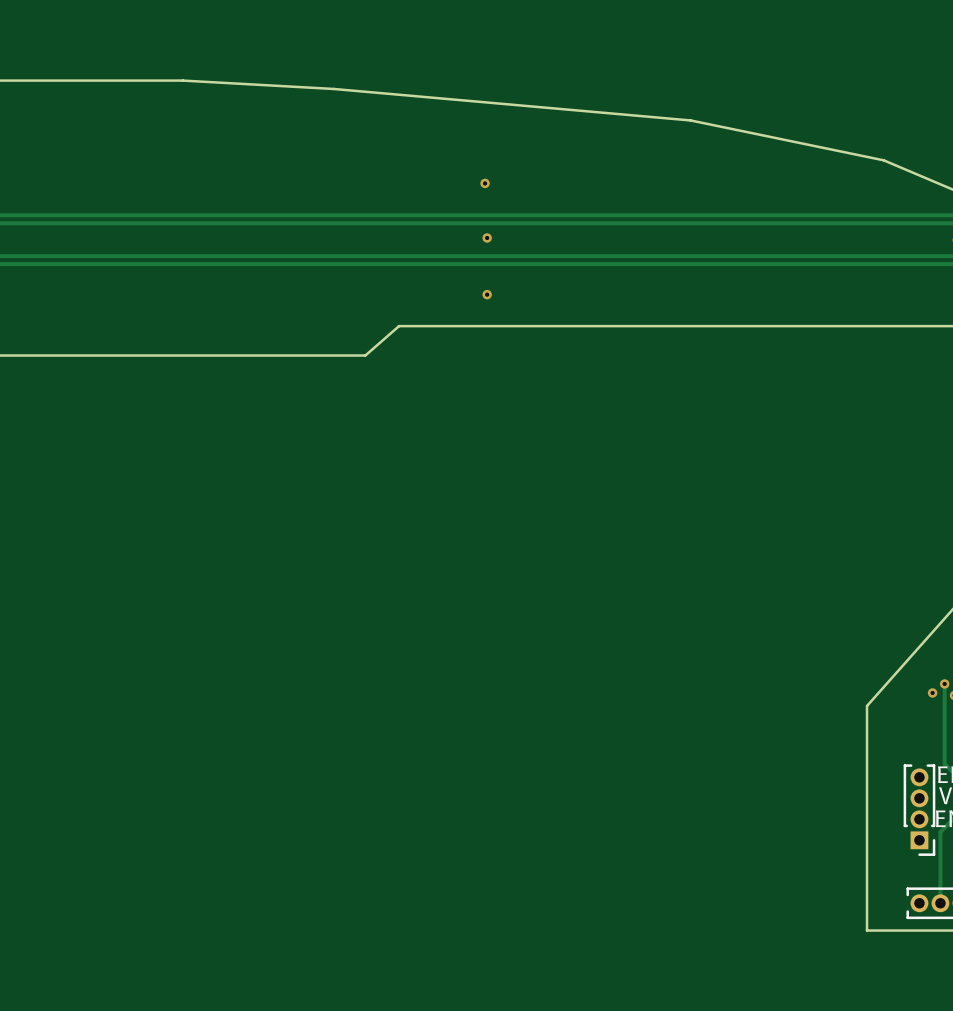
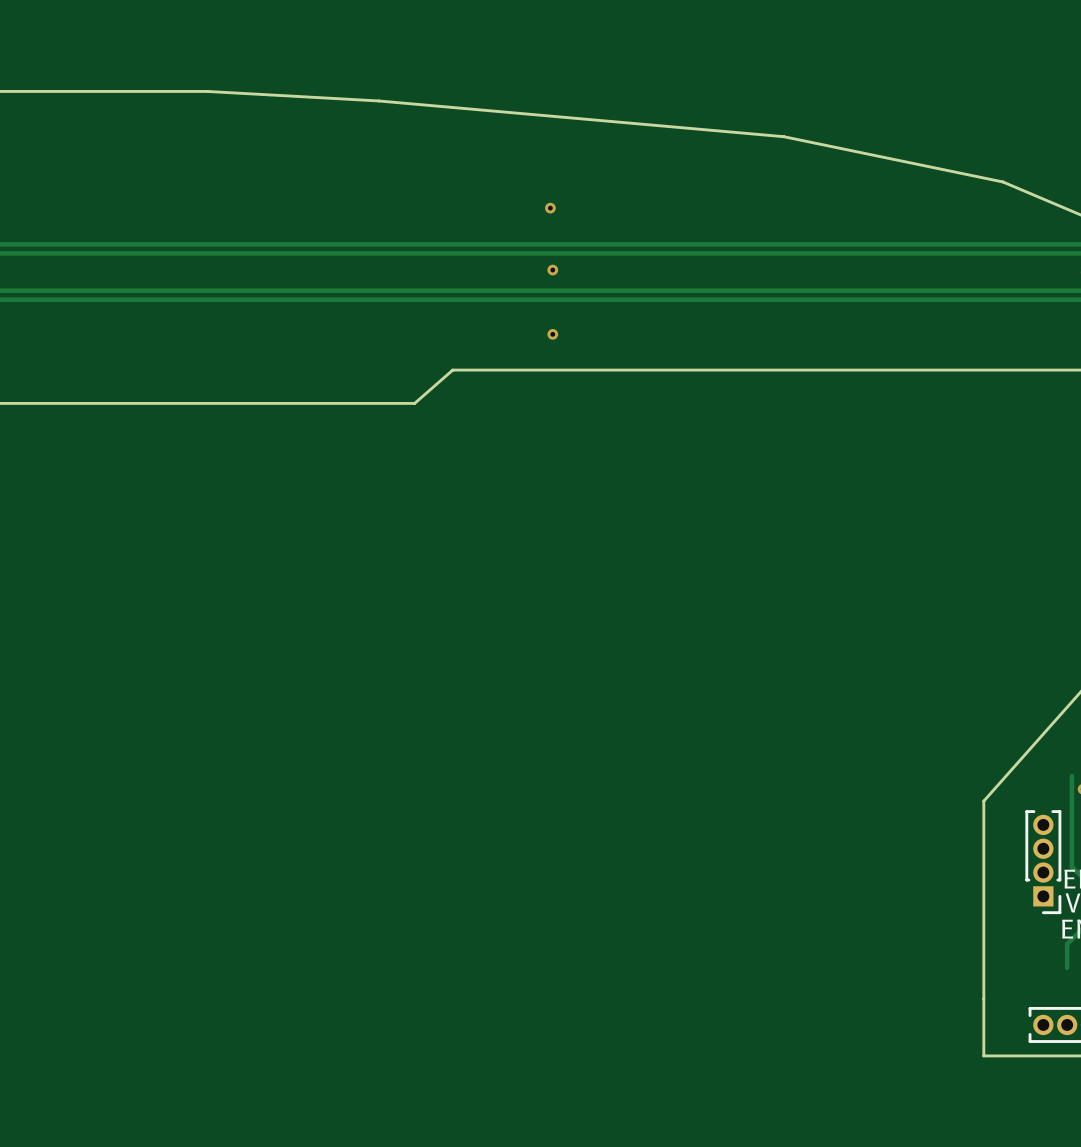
via: (944, 683) -> none
via: (932, 692) -> none
part position: (919, 810) -> (1043, 862)
track: (940, 852) (940, 903) -> none

